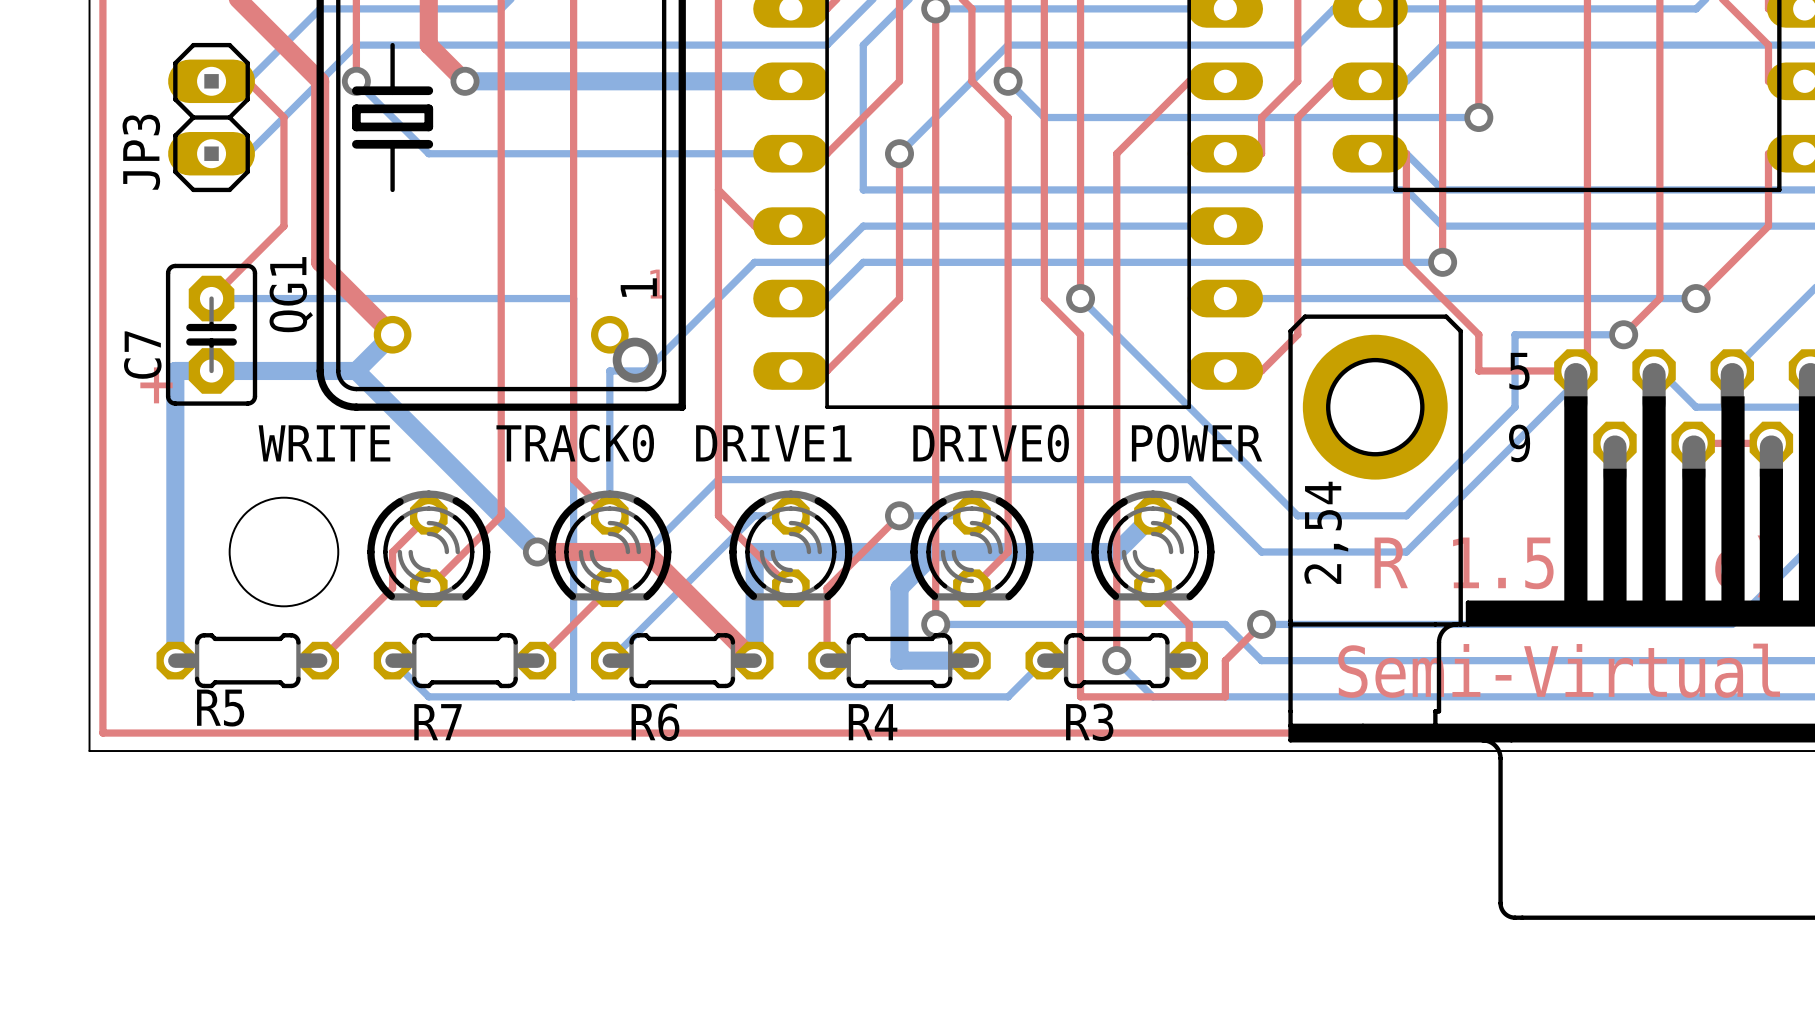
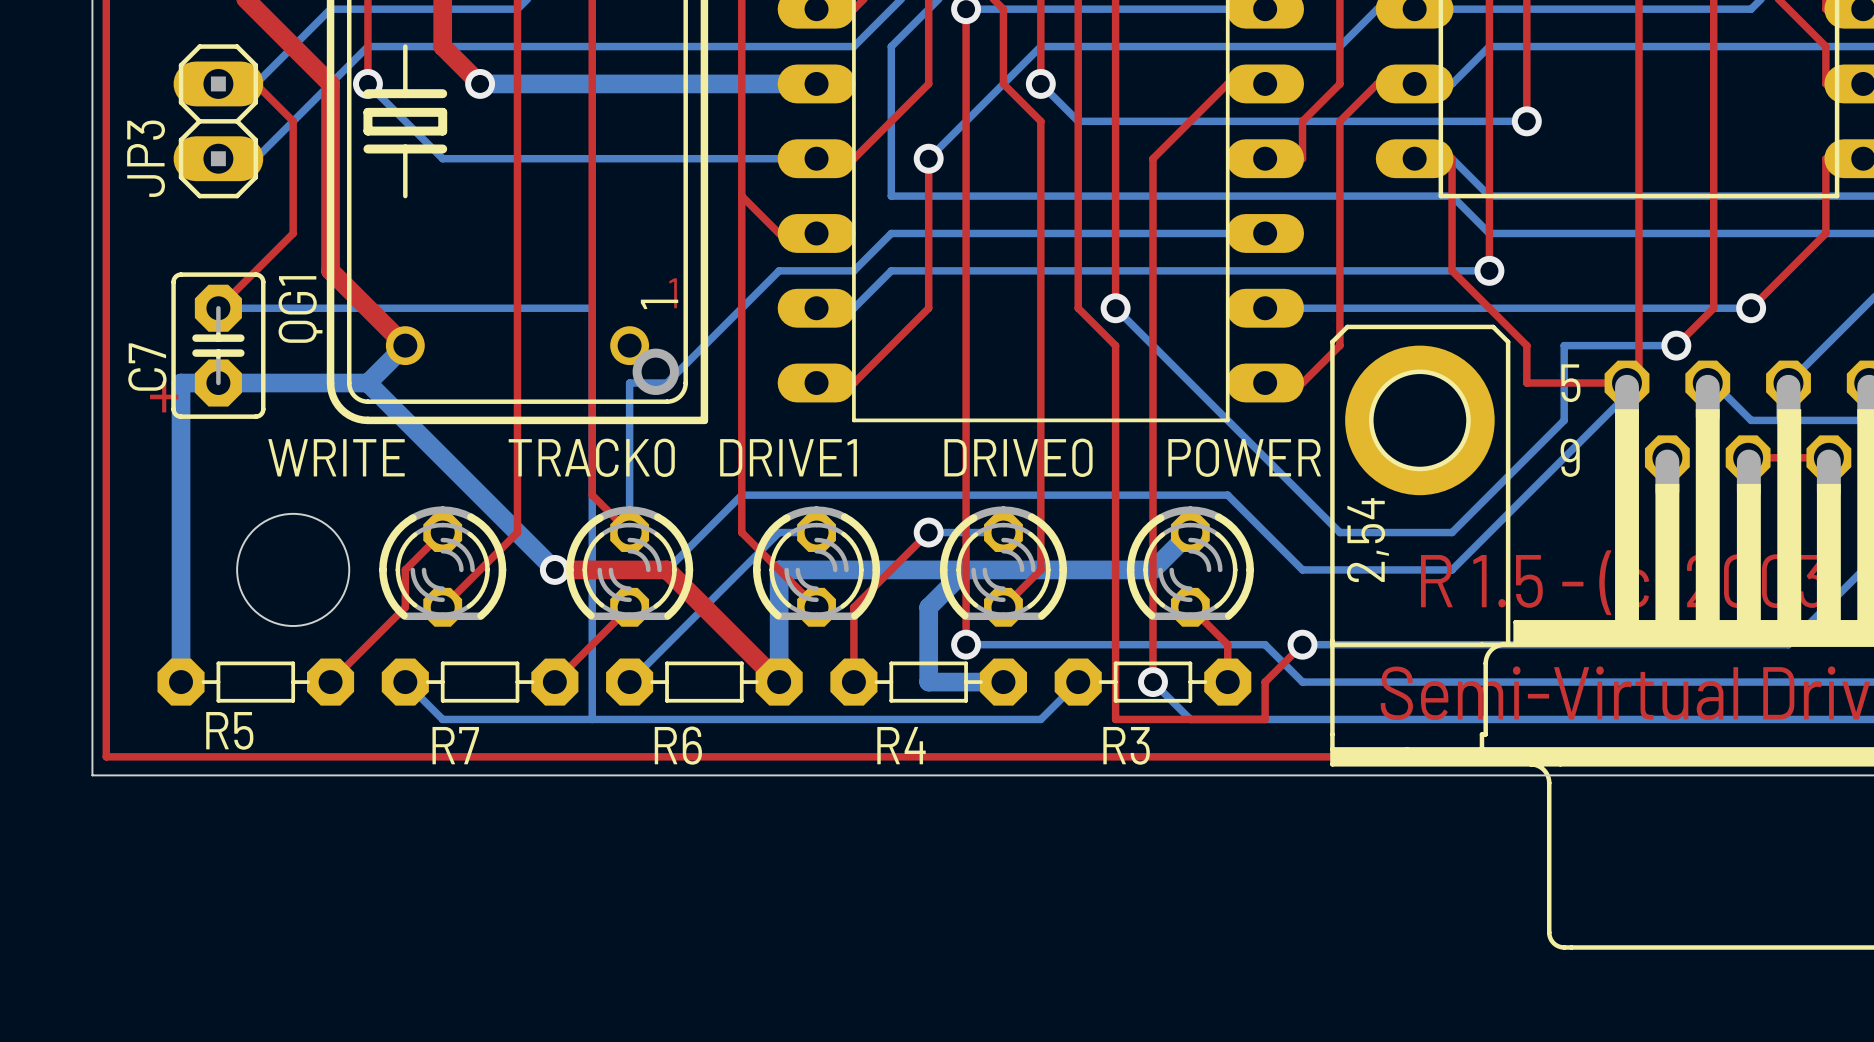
R5 footprint: [156, 633, 340, 689] -> [157, 658, 355, 706]
R7 footprint: [373, 633, 557, 689] -> [381, 658, 579, 706]
R6 footprint: [591, 633, 774, 689] -> [606, 658, 803, 706]
R4 footprint: [808, 633, 991, 689] -> [830, 658, 1028, 706]
R3 footprint: [1025, 633, 1208, 689] -> [1054, 658, 1252, 706]

